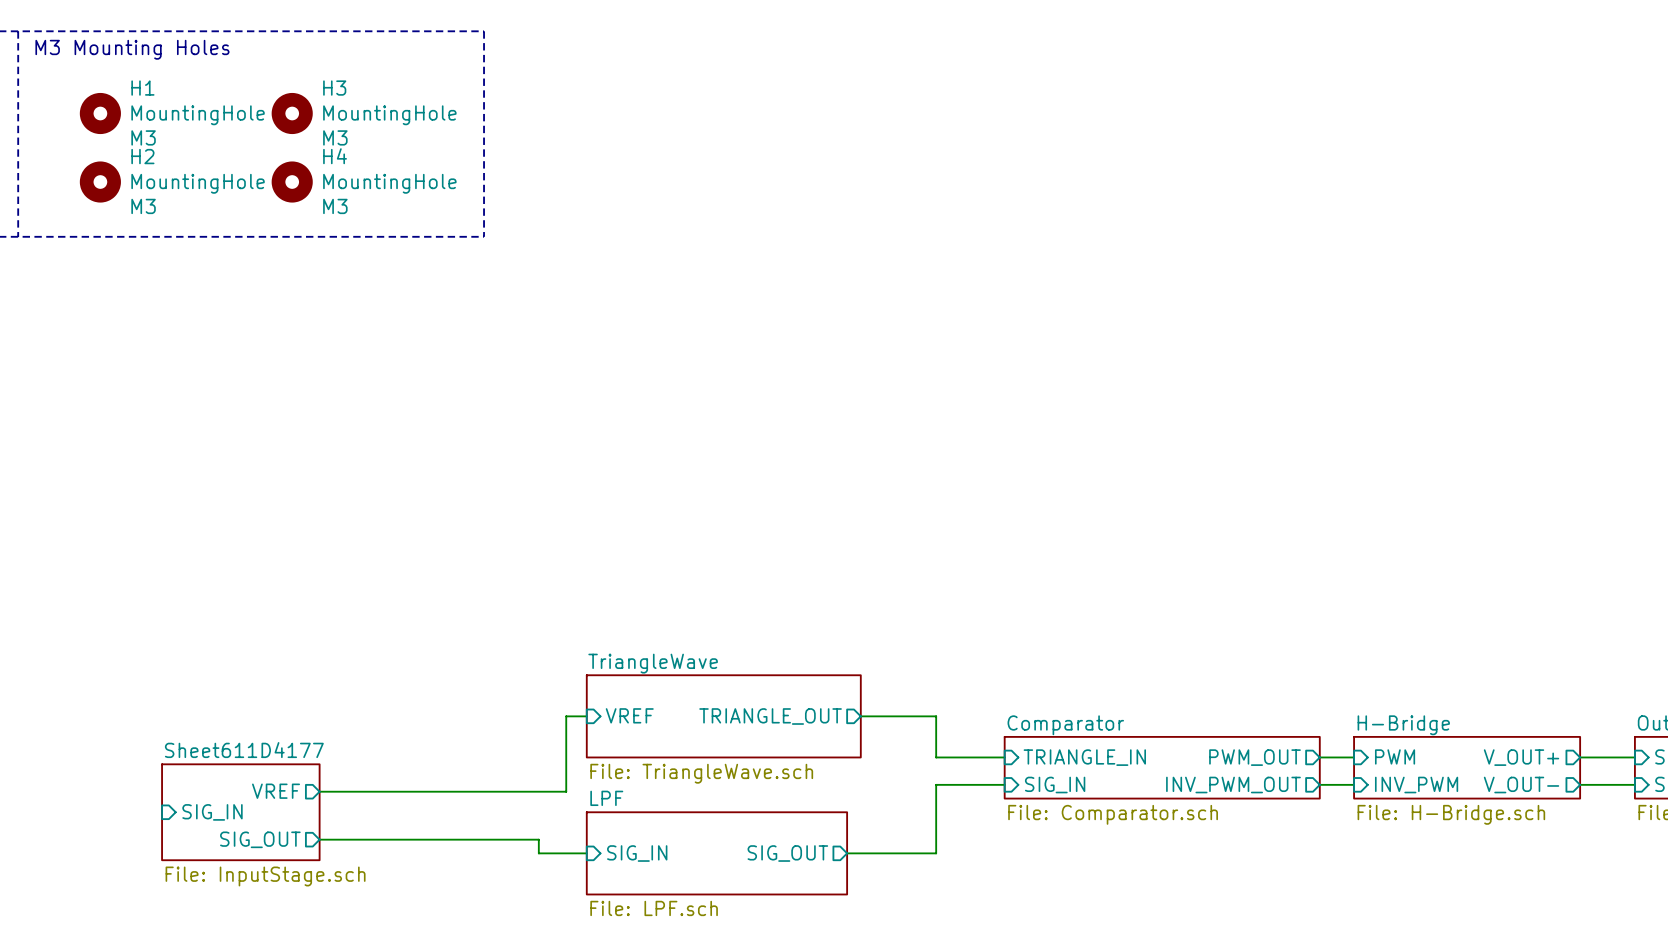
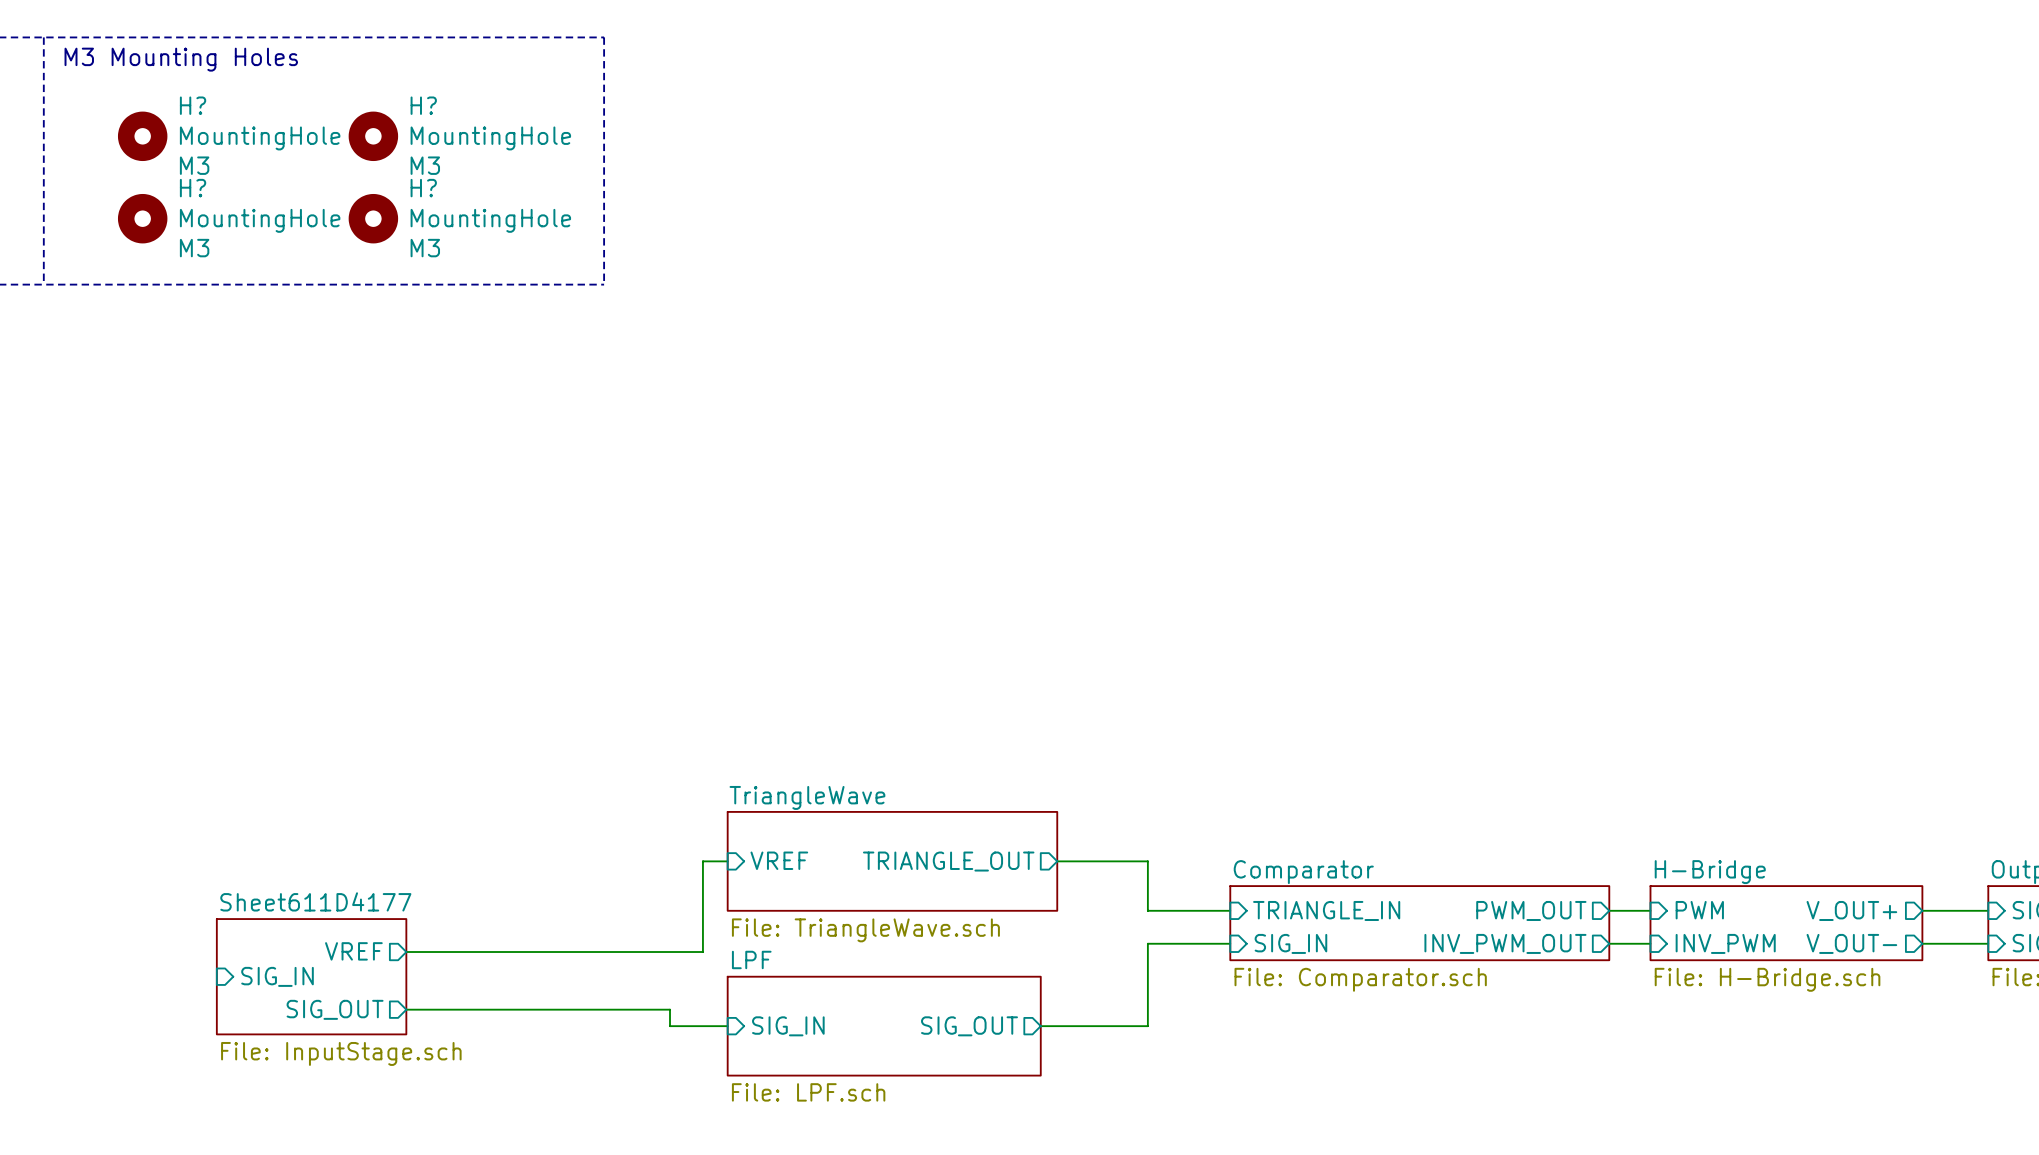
H1 name: H1 (142, 88) -> H? (193, 105)
H3 name: H3 (334, 88) -> H? (423, 105)
H2 name: H2 (142, 156) -> H? (193, 188)
H4 name: H4 (335, 156) -> H? (423, 188)

